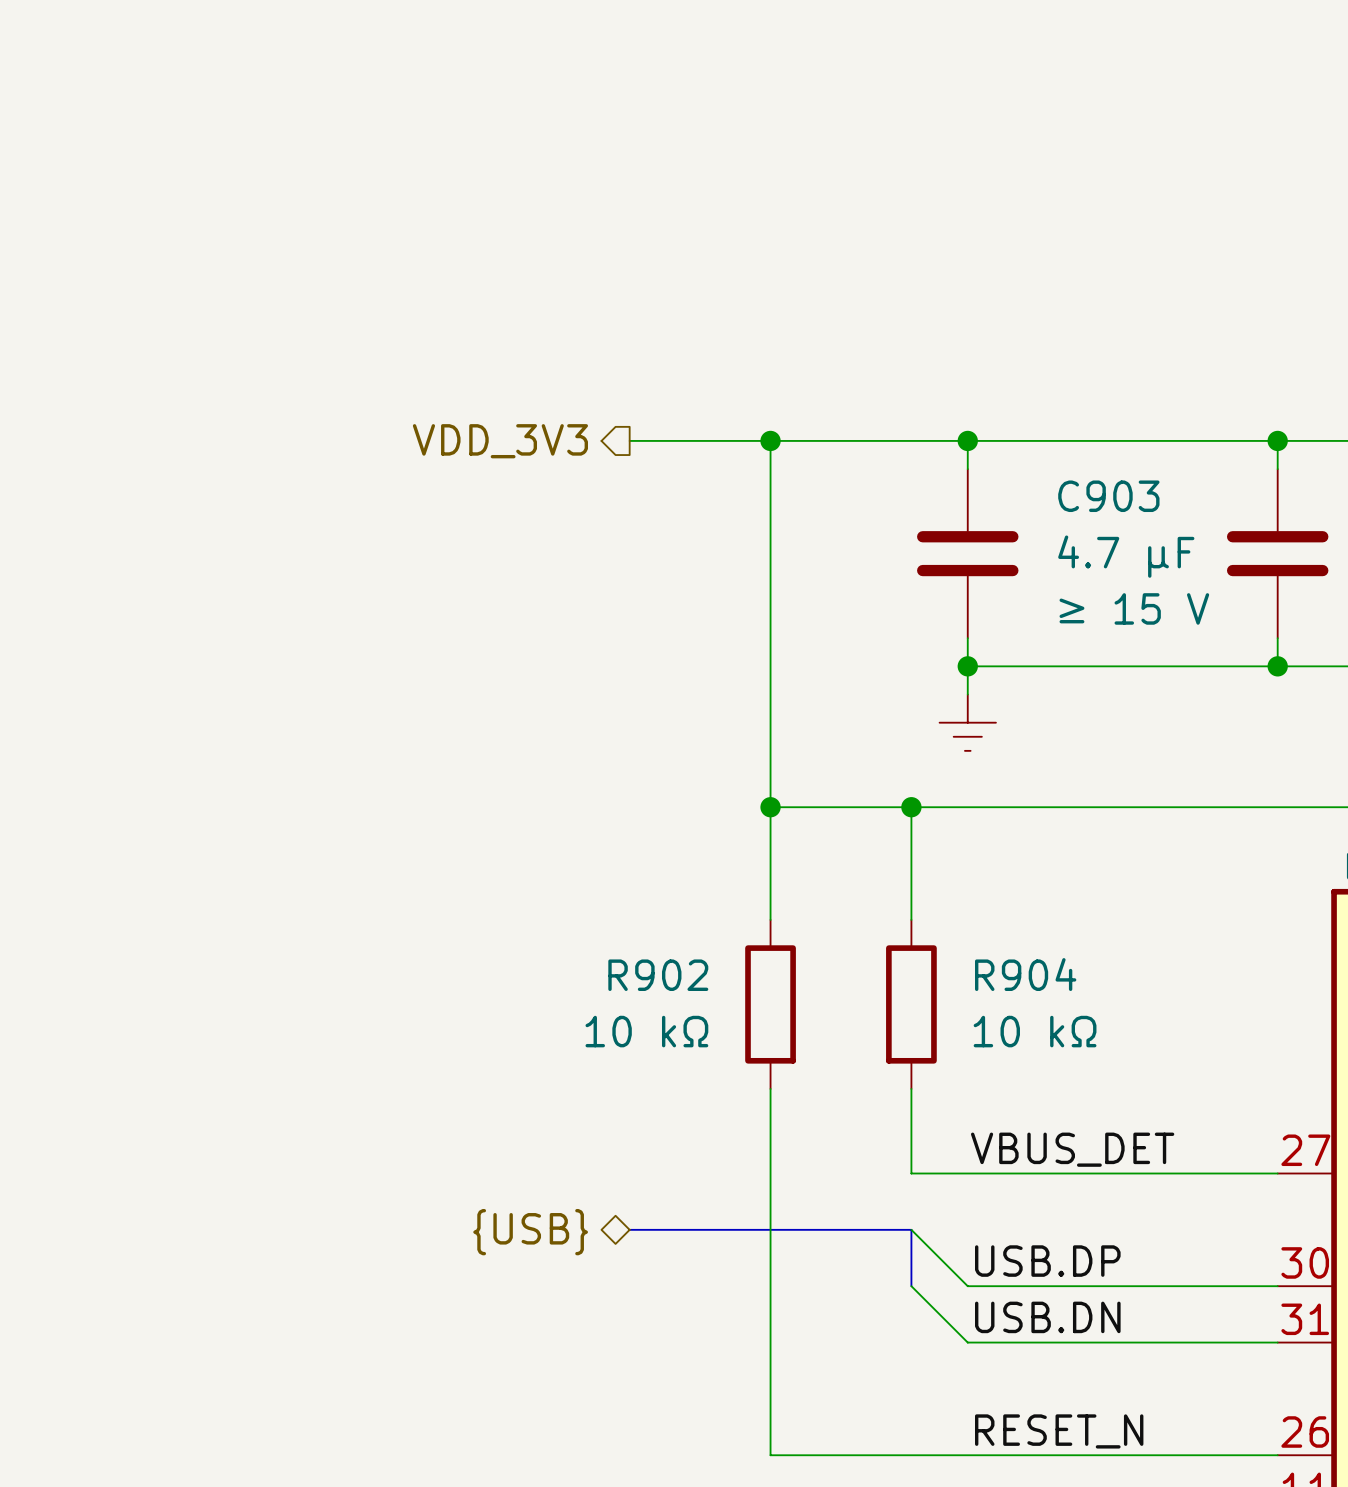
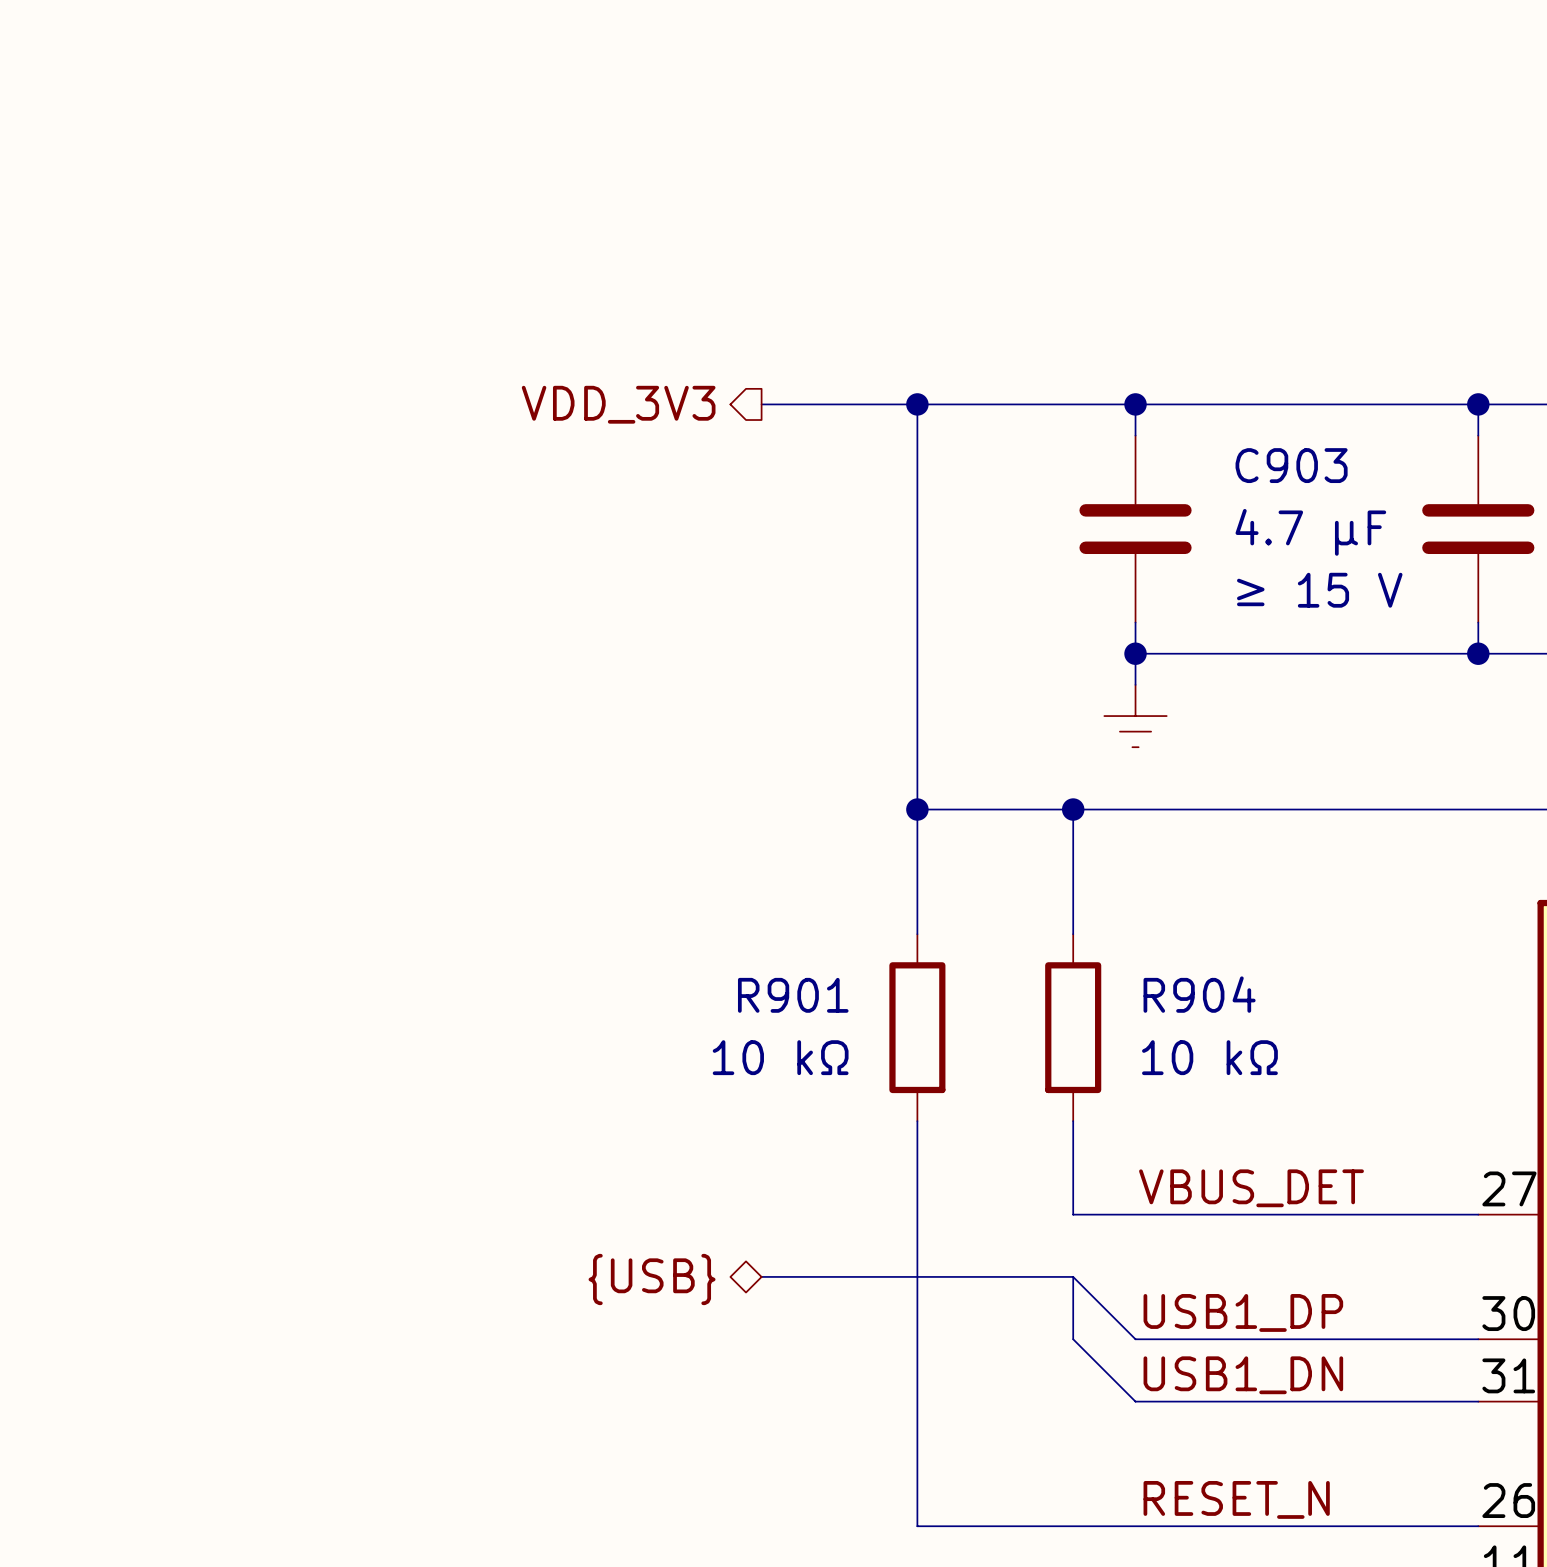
R902 name: R902 (658, 975) -> R901 (793, 995)
label: USB.DP (1047, 1261) -> USB1_DP (1243, 1312)
label: USB.DN (1047, 1317) -> USB1_DN (1243, 1375)

